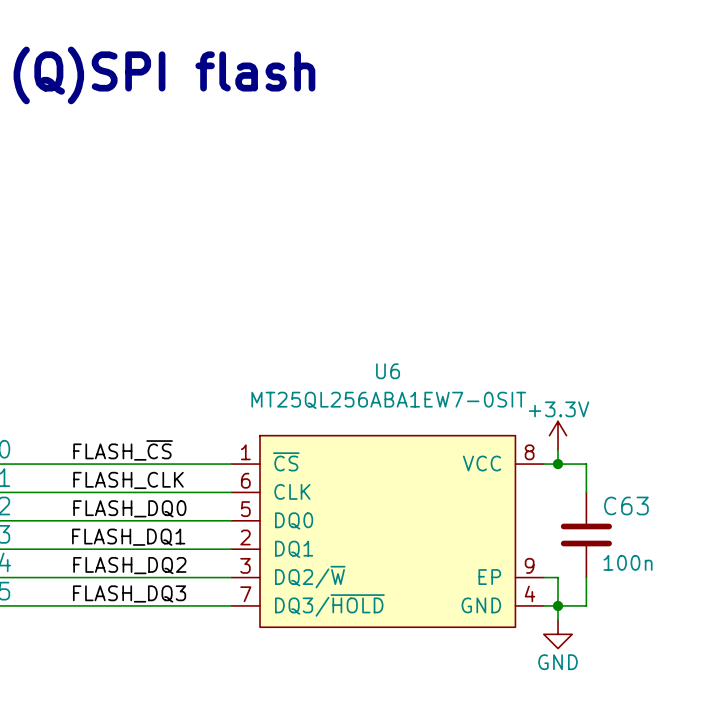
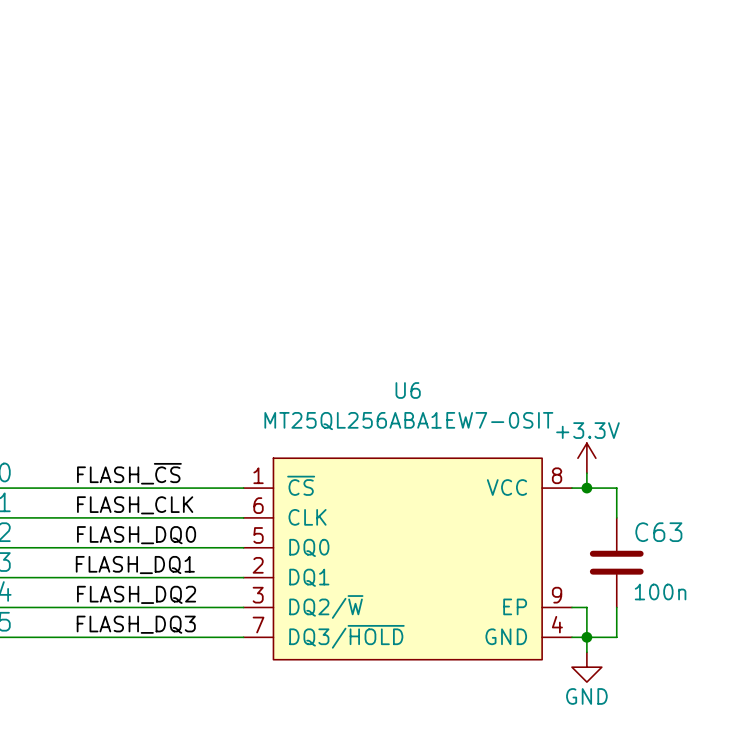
text: (Q)SPI flash (164, 75) -> none

